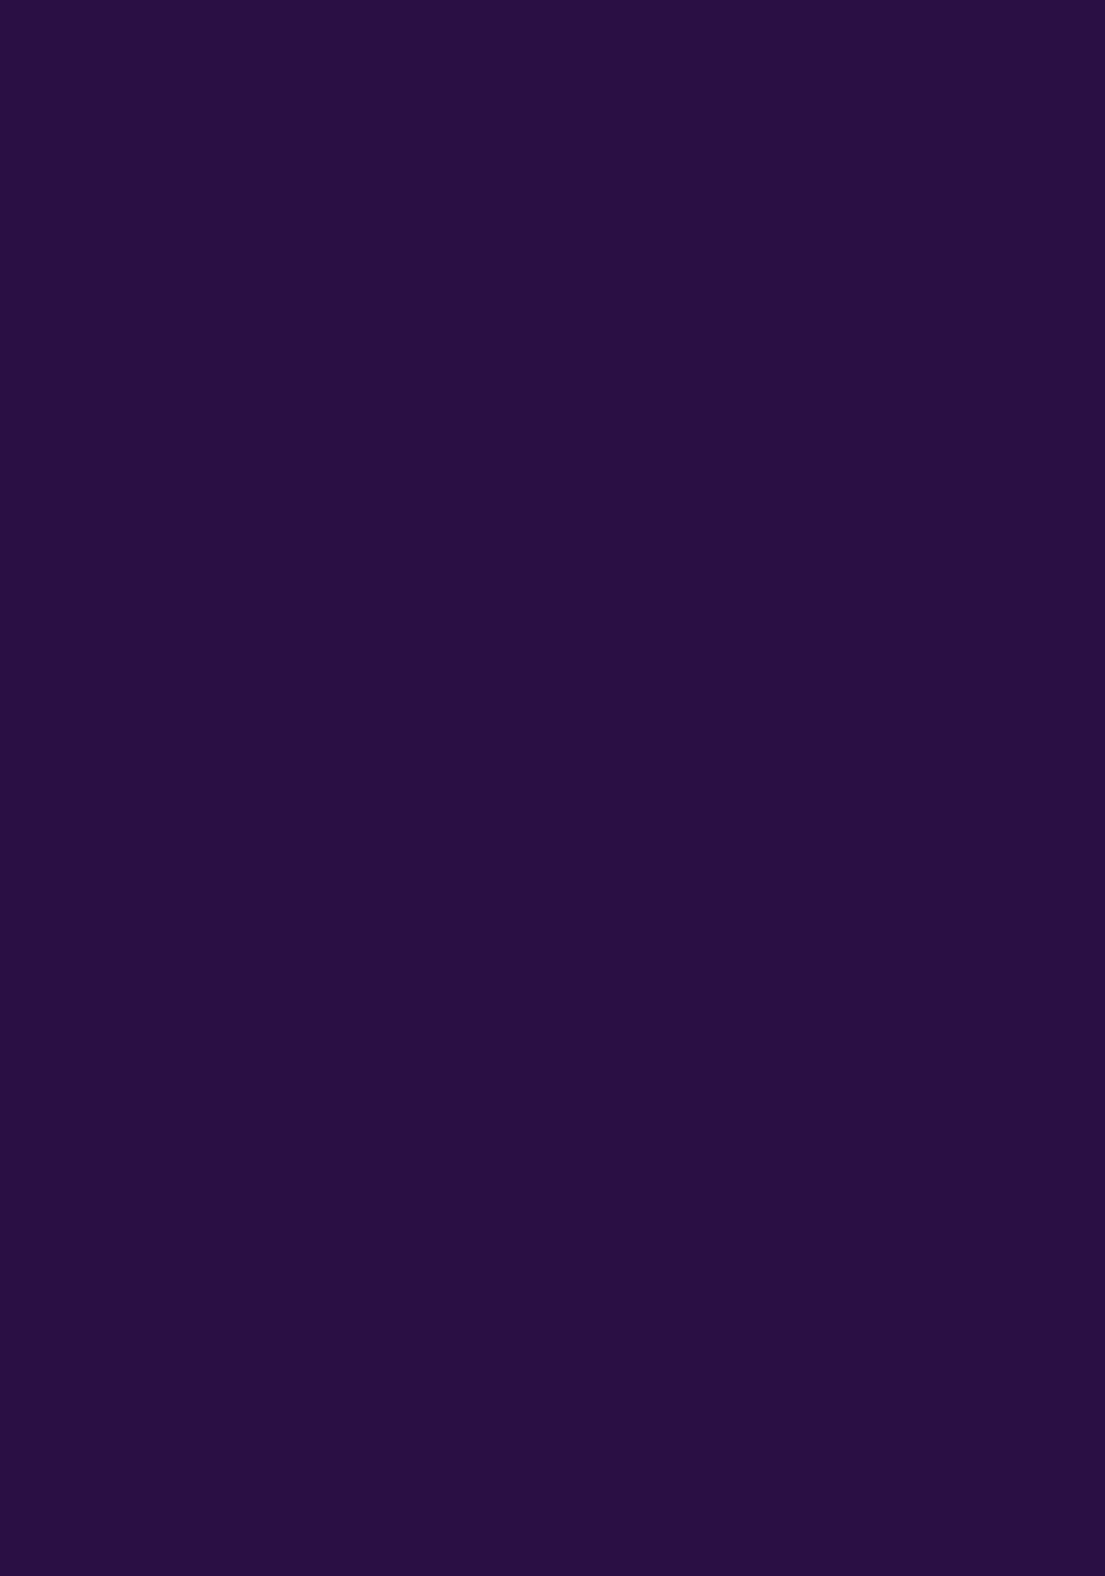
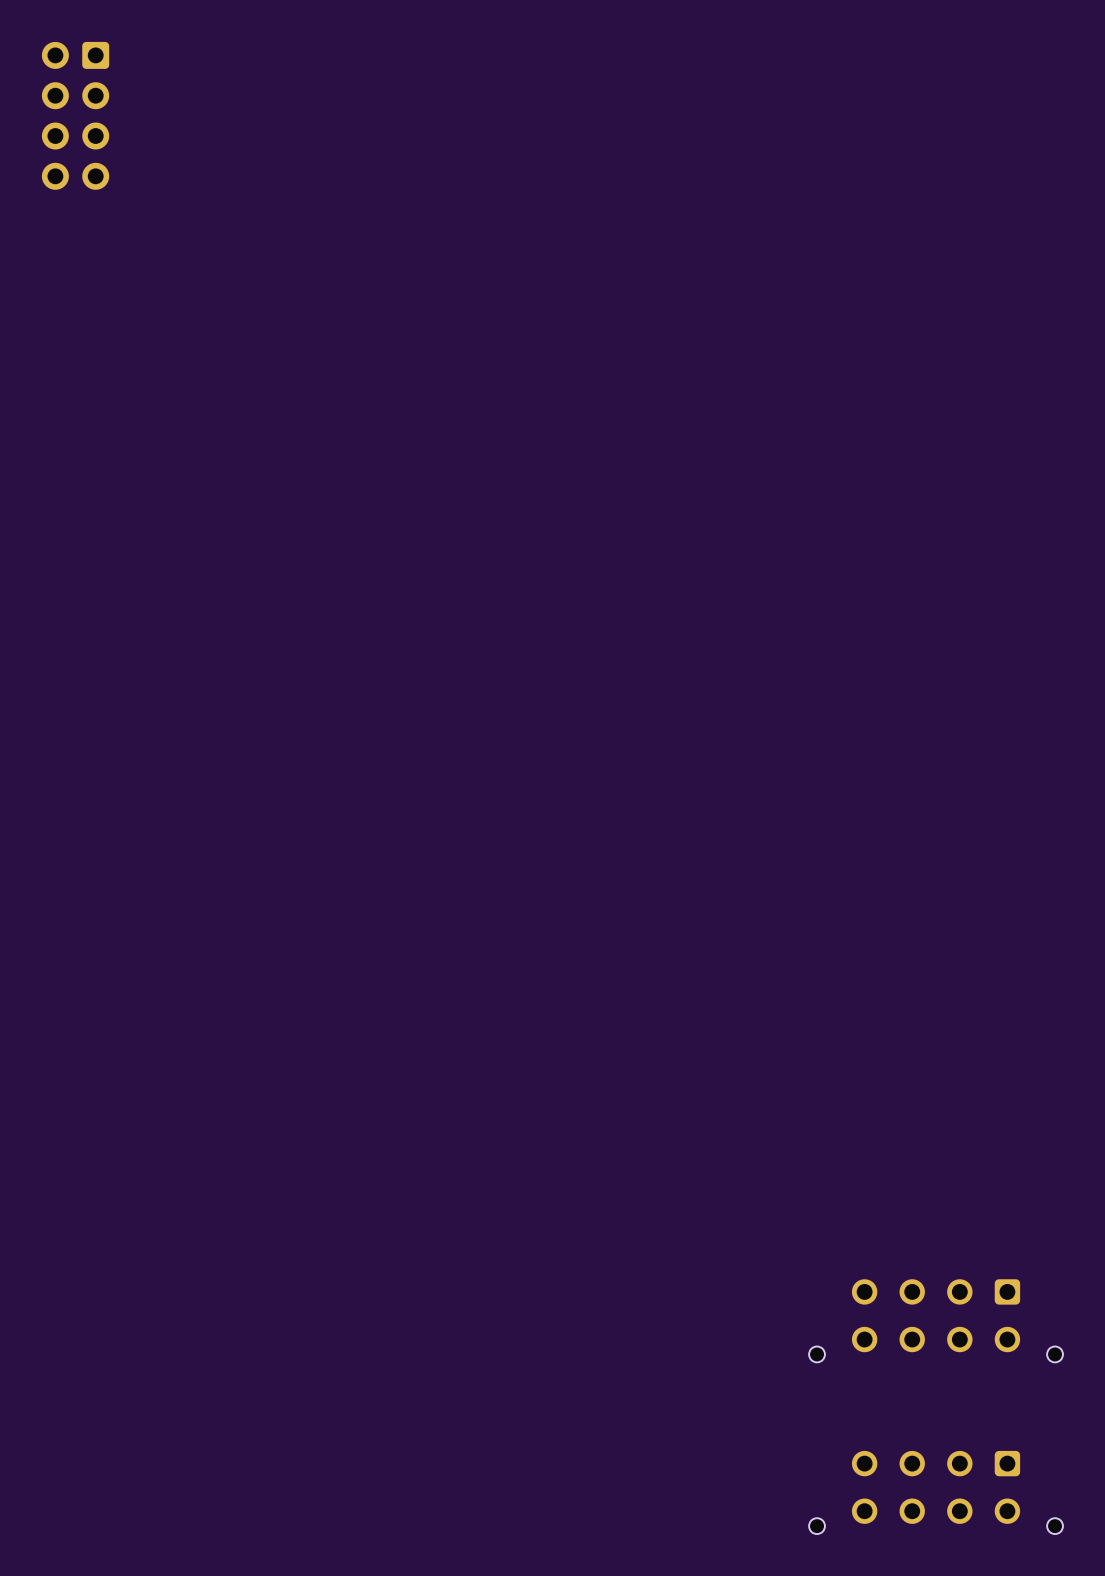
part: none -> (75, 115)
part: none -> (936, 1320)
part: none -> (936, 1492)

